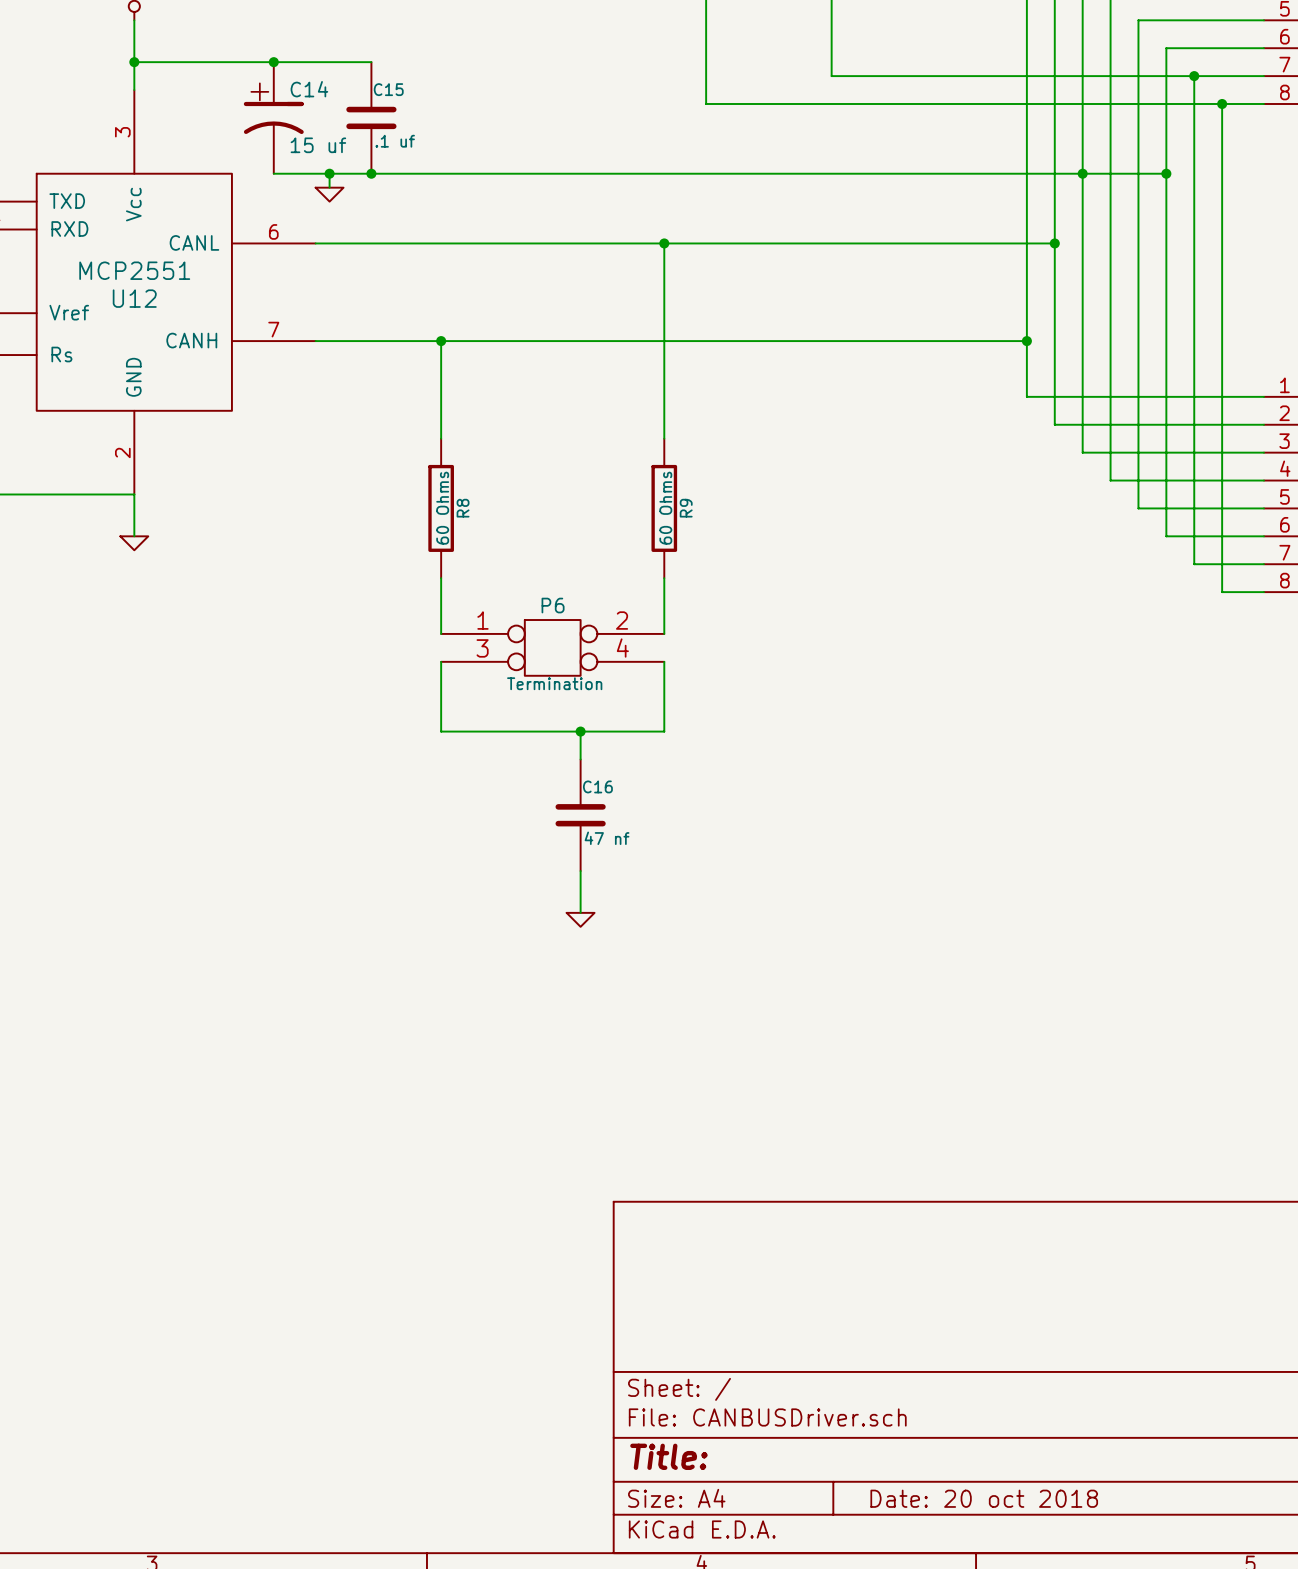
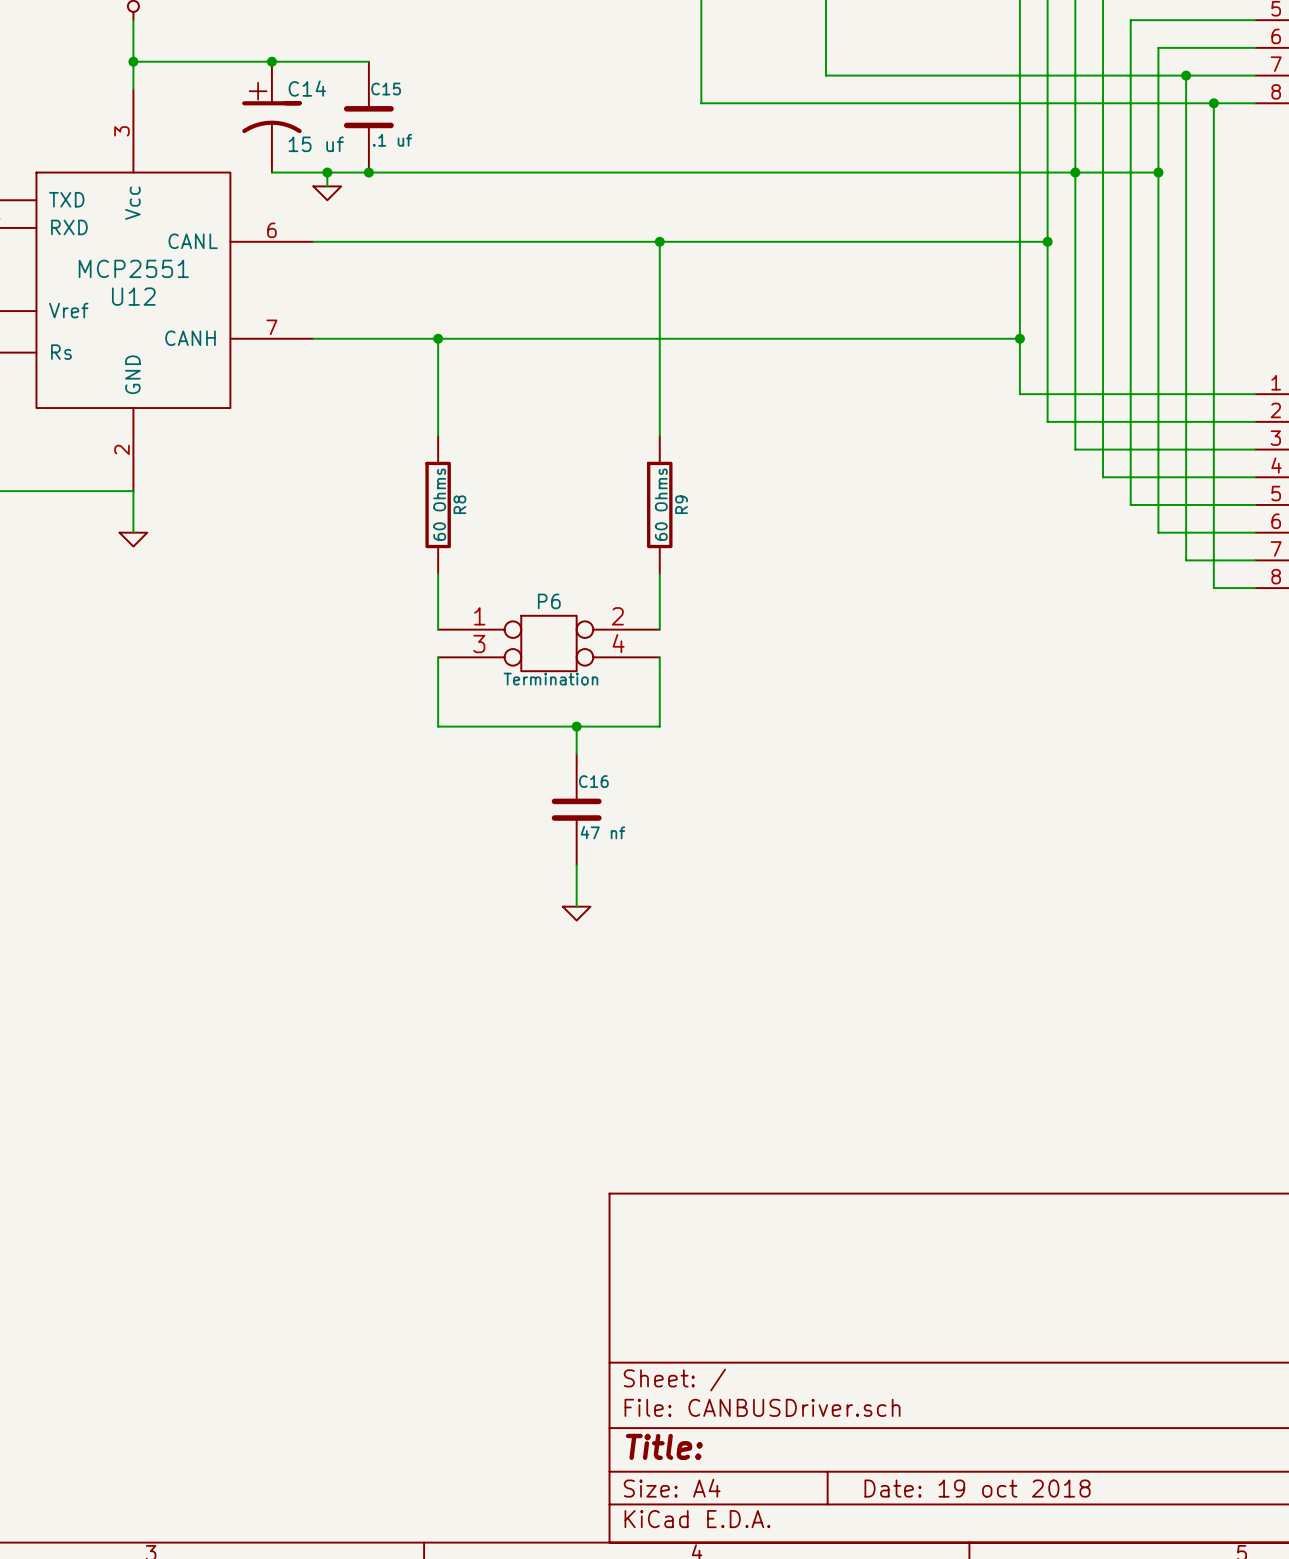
title block: Date: 20 oct 2018 (984, 1498) -> Date: 19 oct 2018 (977, 1488)

